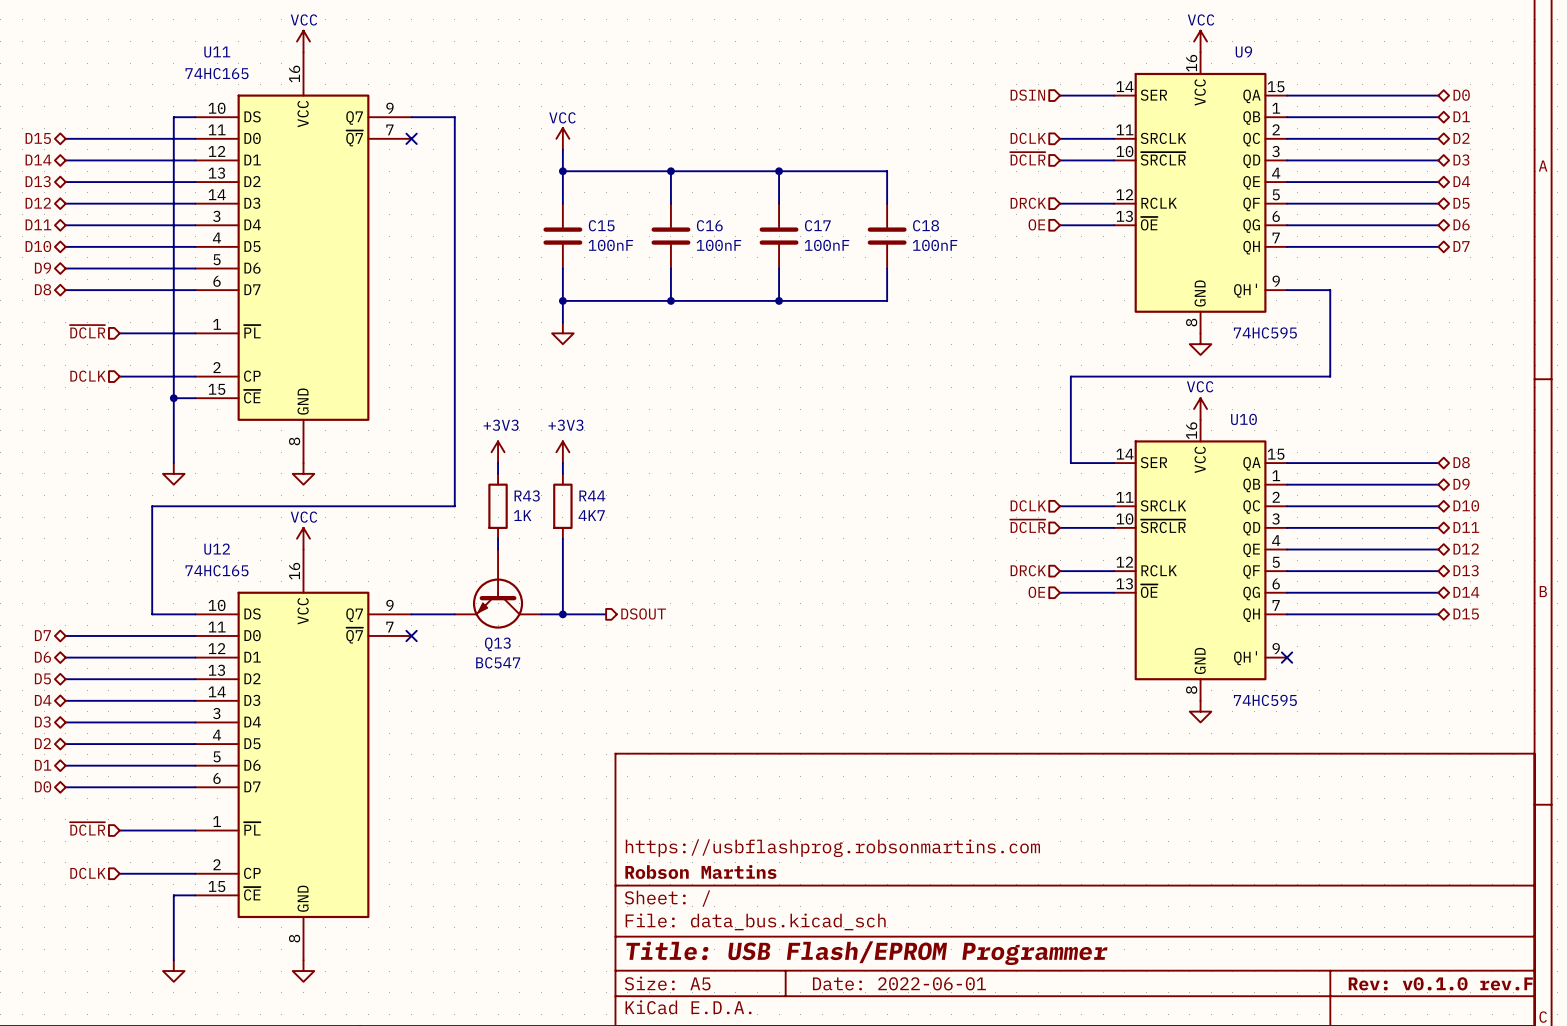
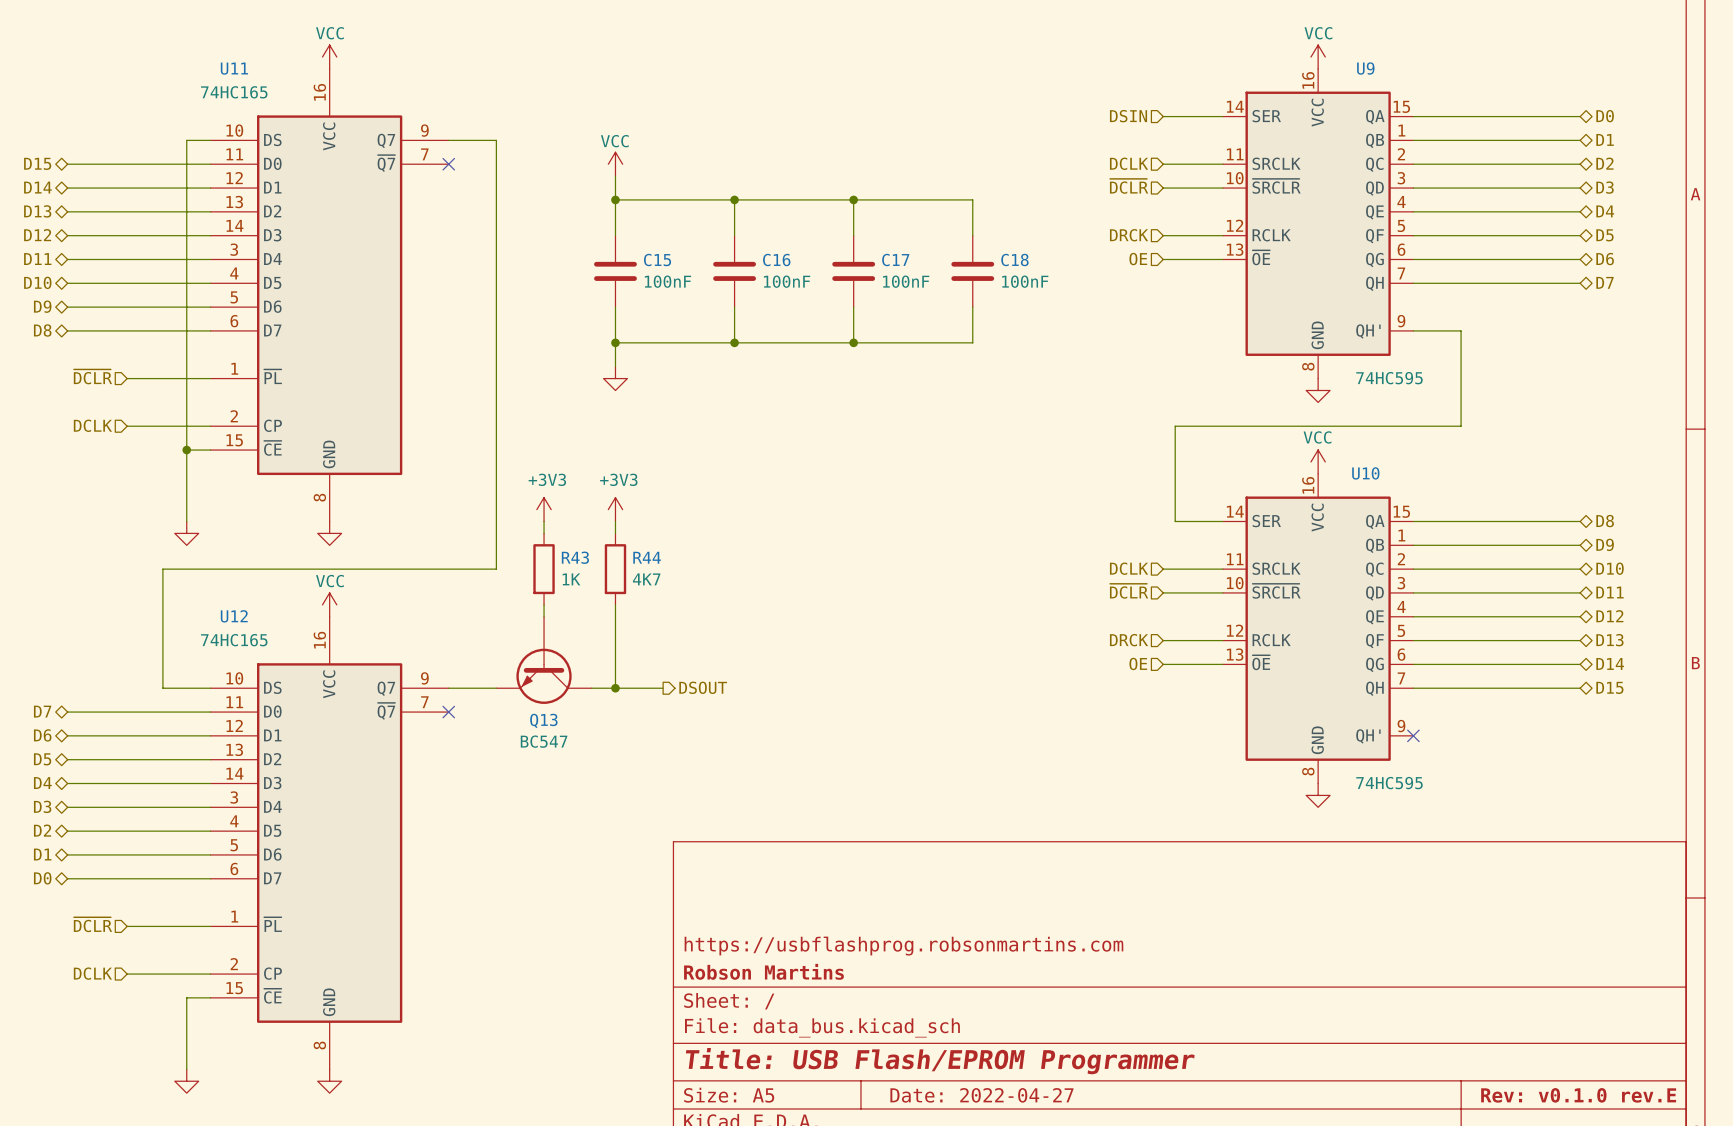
title block: Date: 2022-06-01 (899, 983) -> Date: 2022-04-27 (981, 1095)
title block: Rev: v0.1.0 rev.F (1440, 983) -> Rev: v0.1.0 rev.E (1578, 1095)

